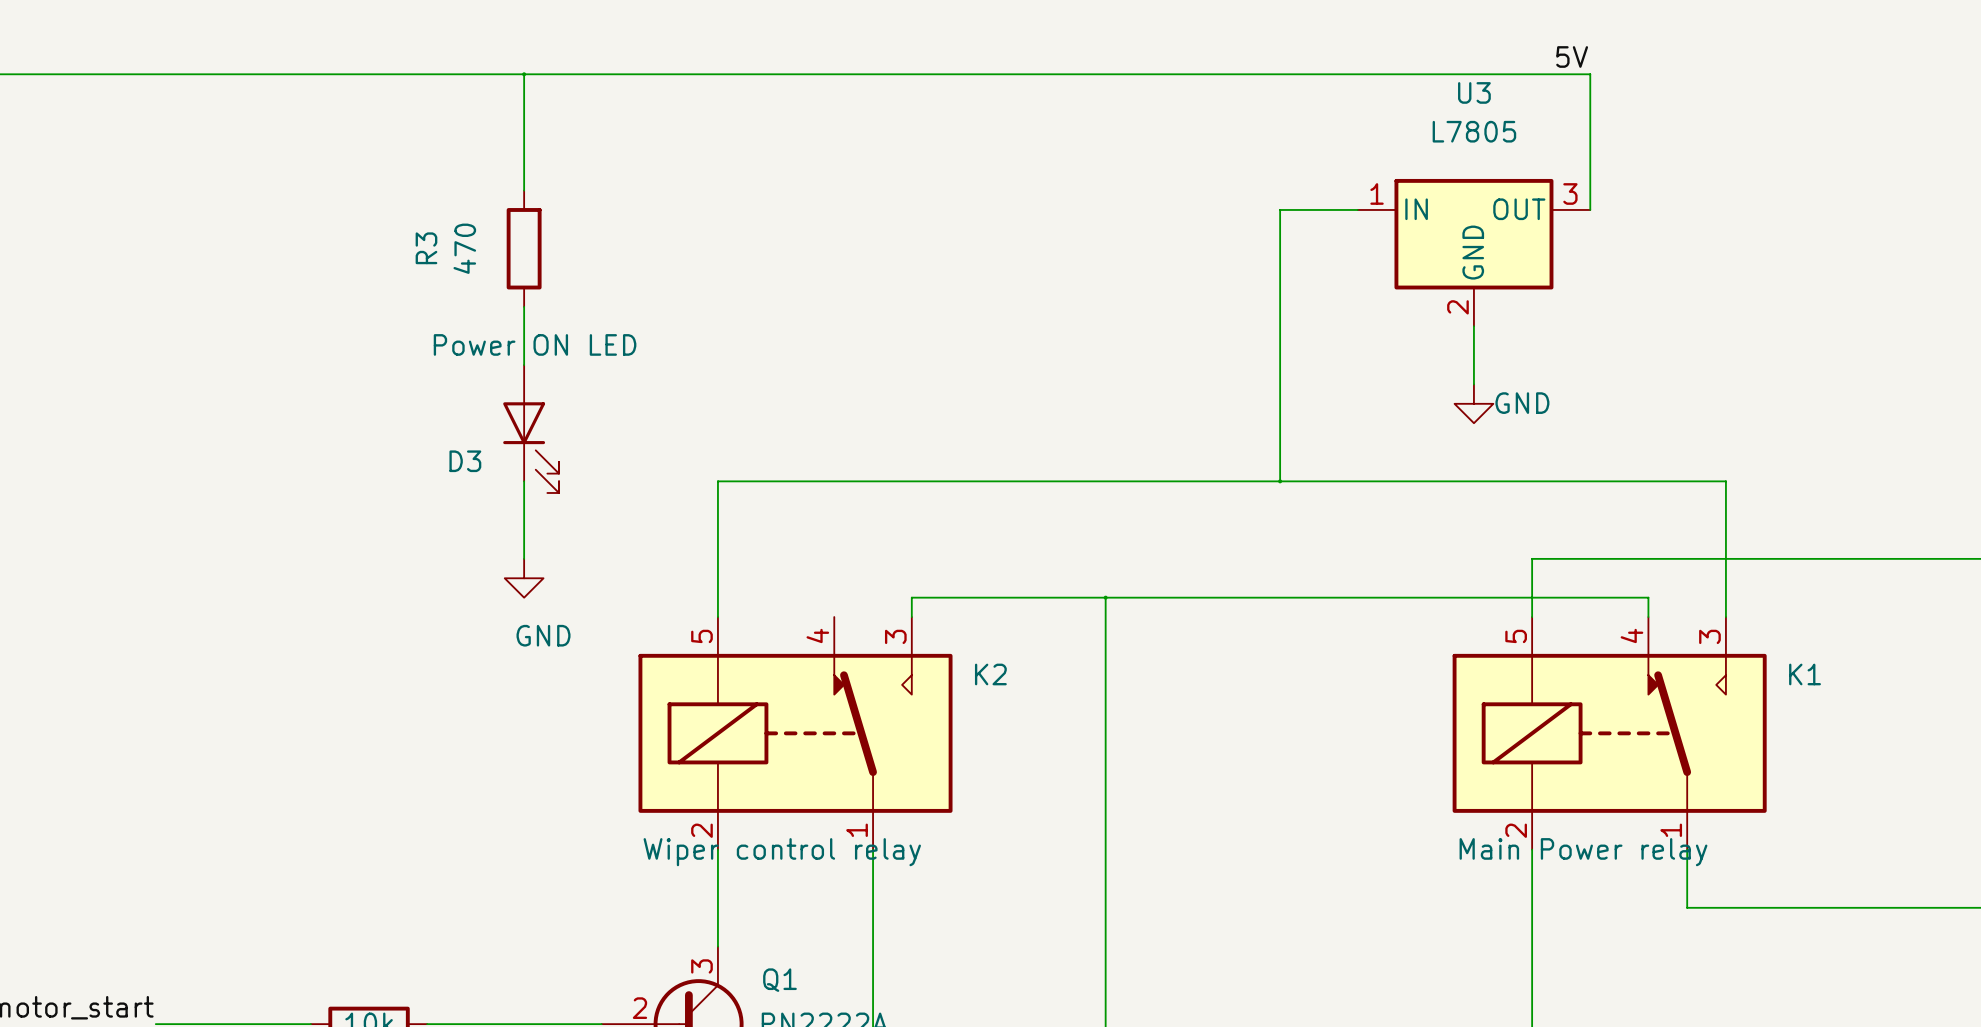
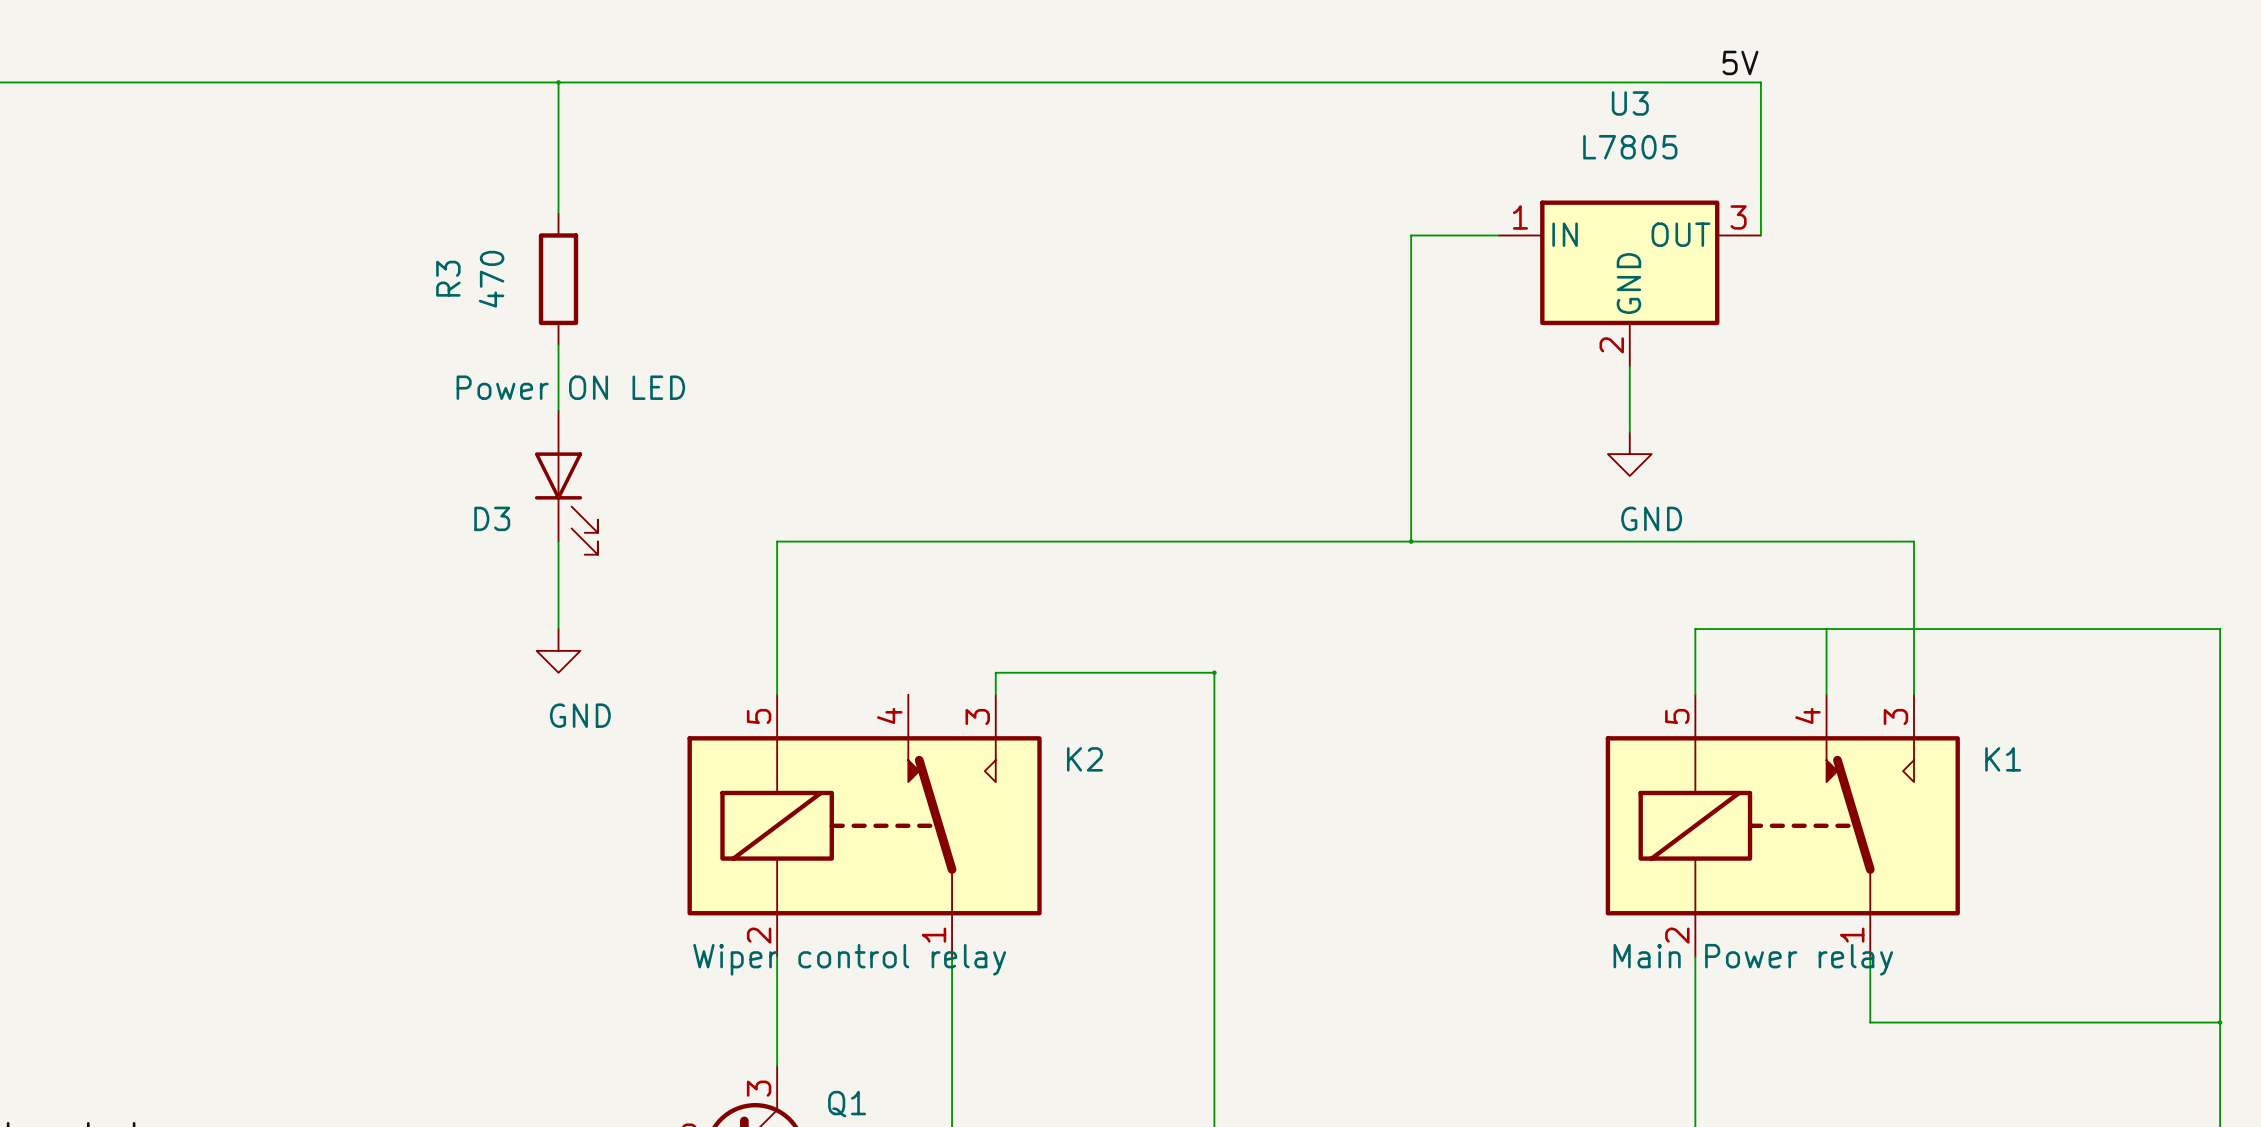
power symbol text position: GND (1522, 403) -> GND (1651, 518)
wire: (1105, 597) (1648, 597) -> (1826, 629) (1826, 672)

